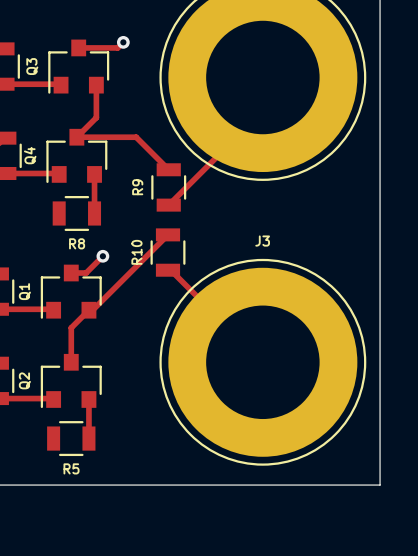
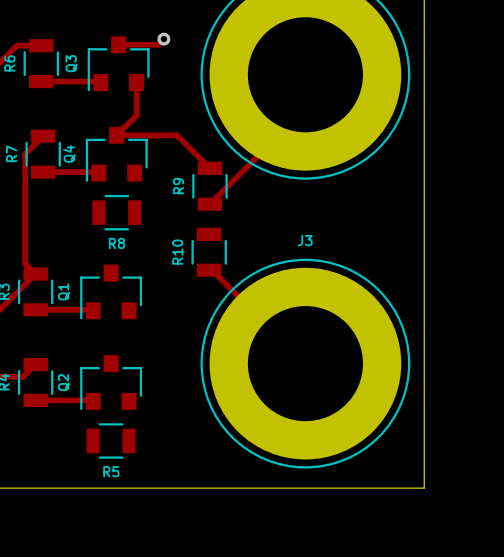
top track: (94, 174) (94, 213) -> none
top track: (168, 234) (92, 310) (88, 310) (71, 327) (71, 362) -> none
top track: (102, 256) (86, 273) (71, 273) -> none
via: (102, 256) -> none
top track: (88, 399) (88, 438) -> none

